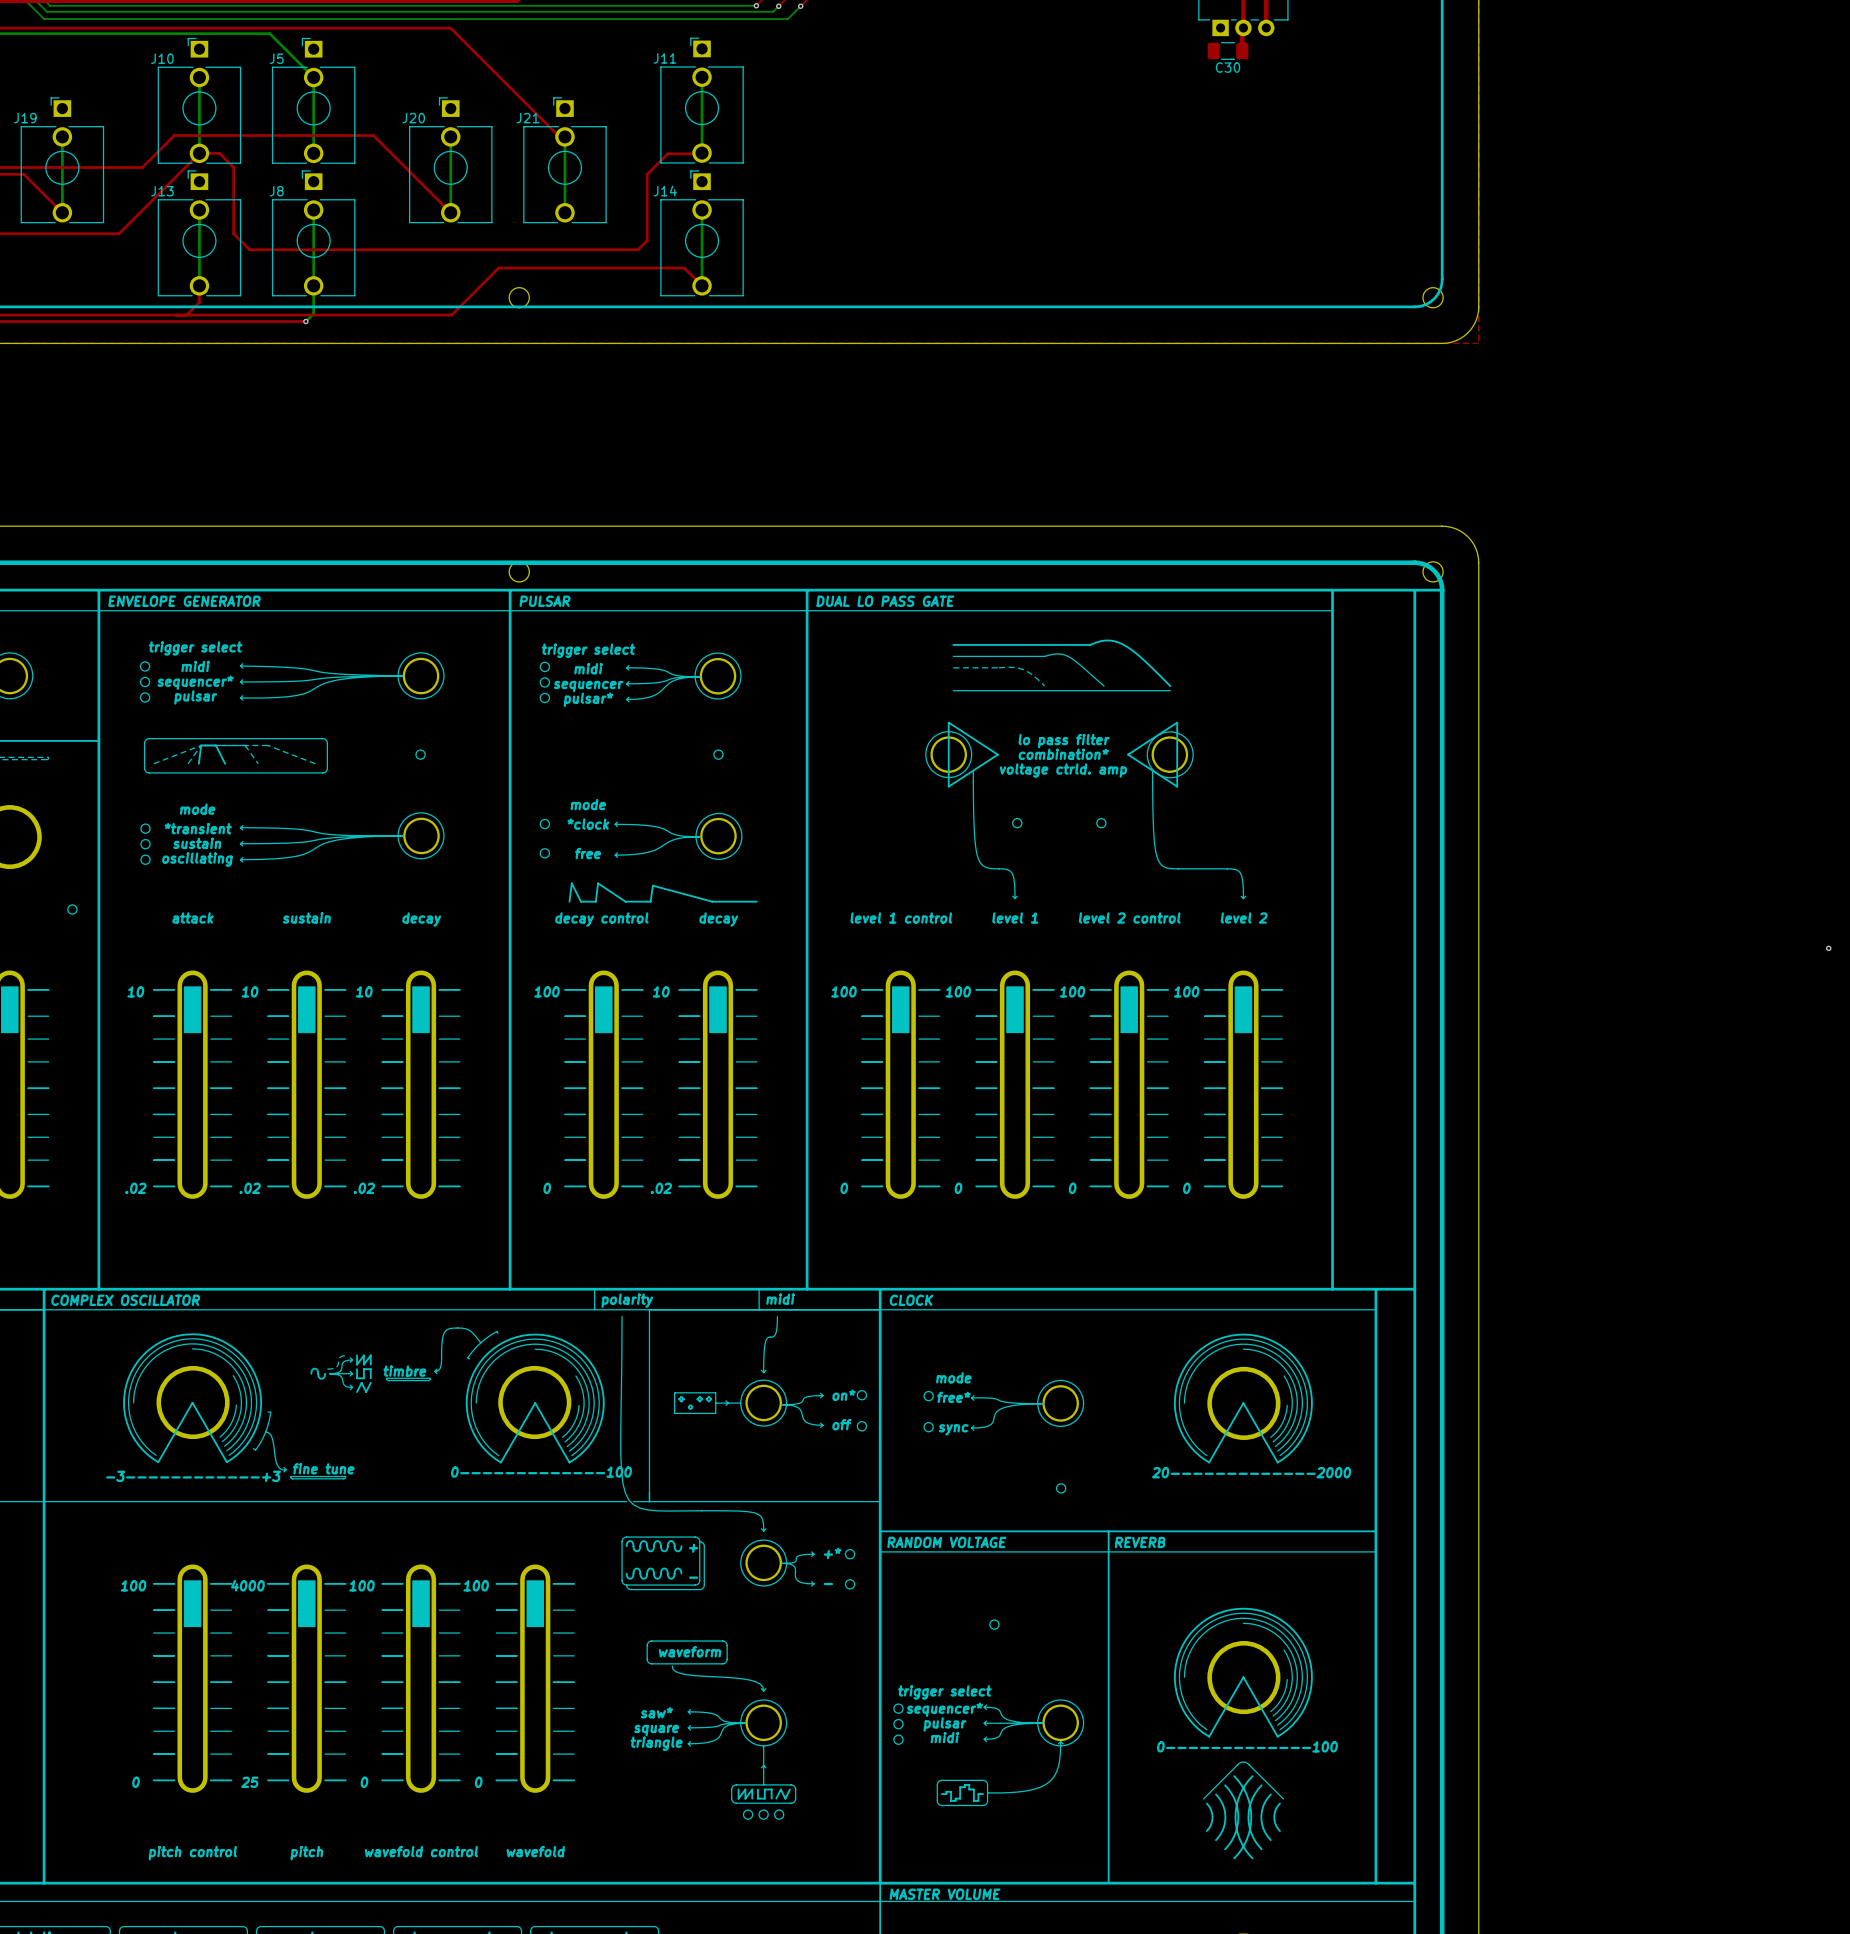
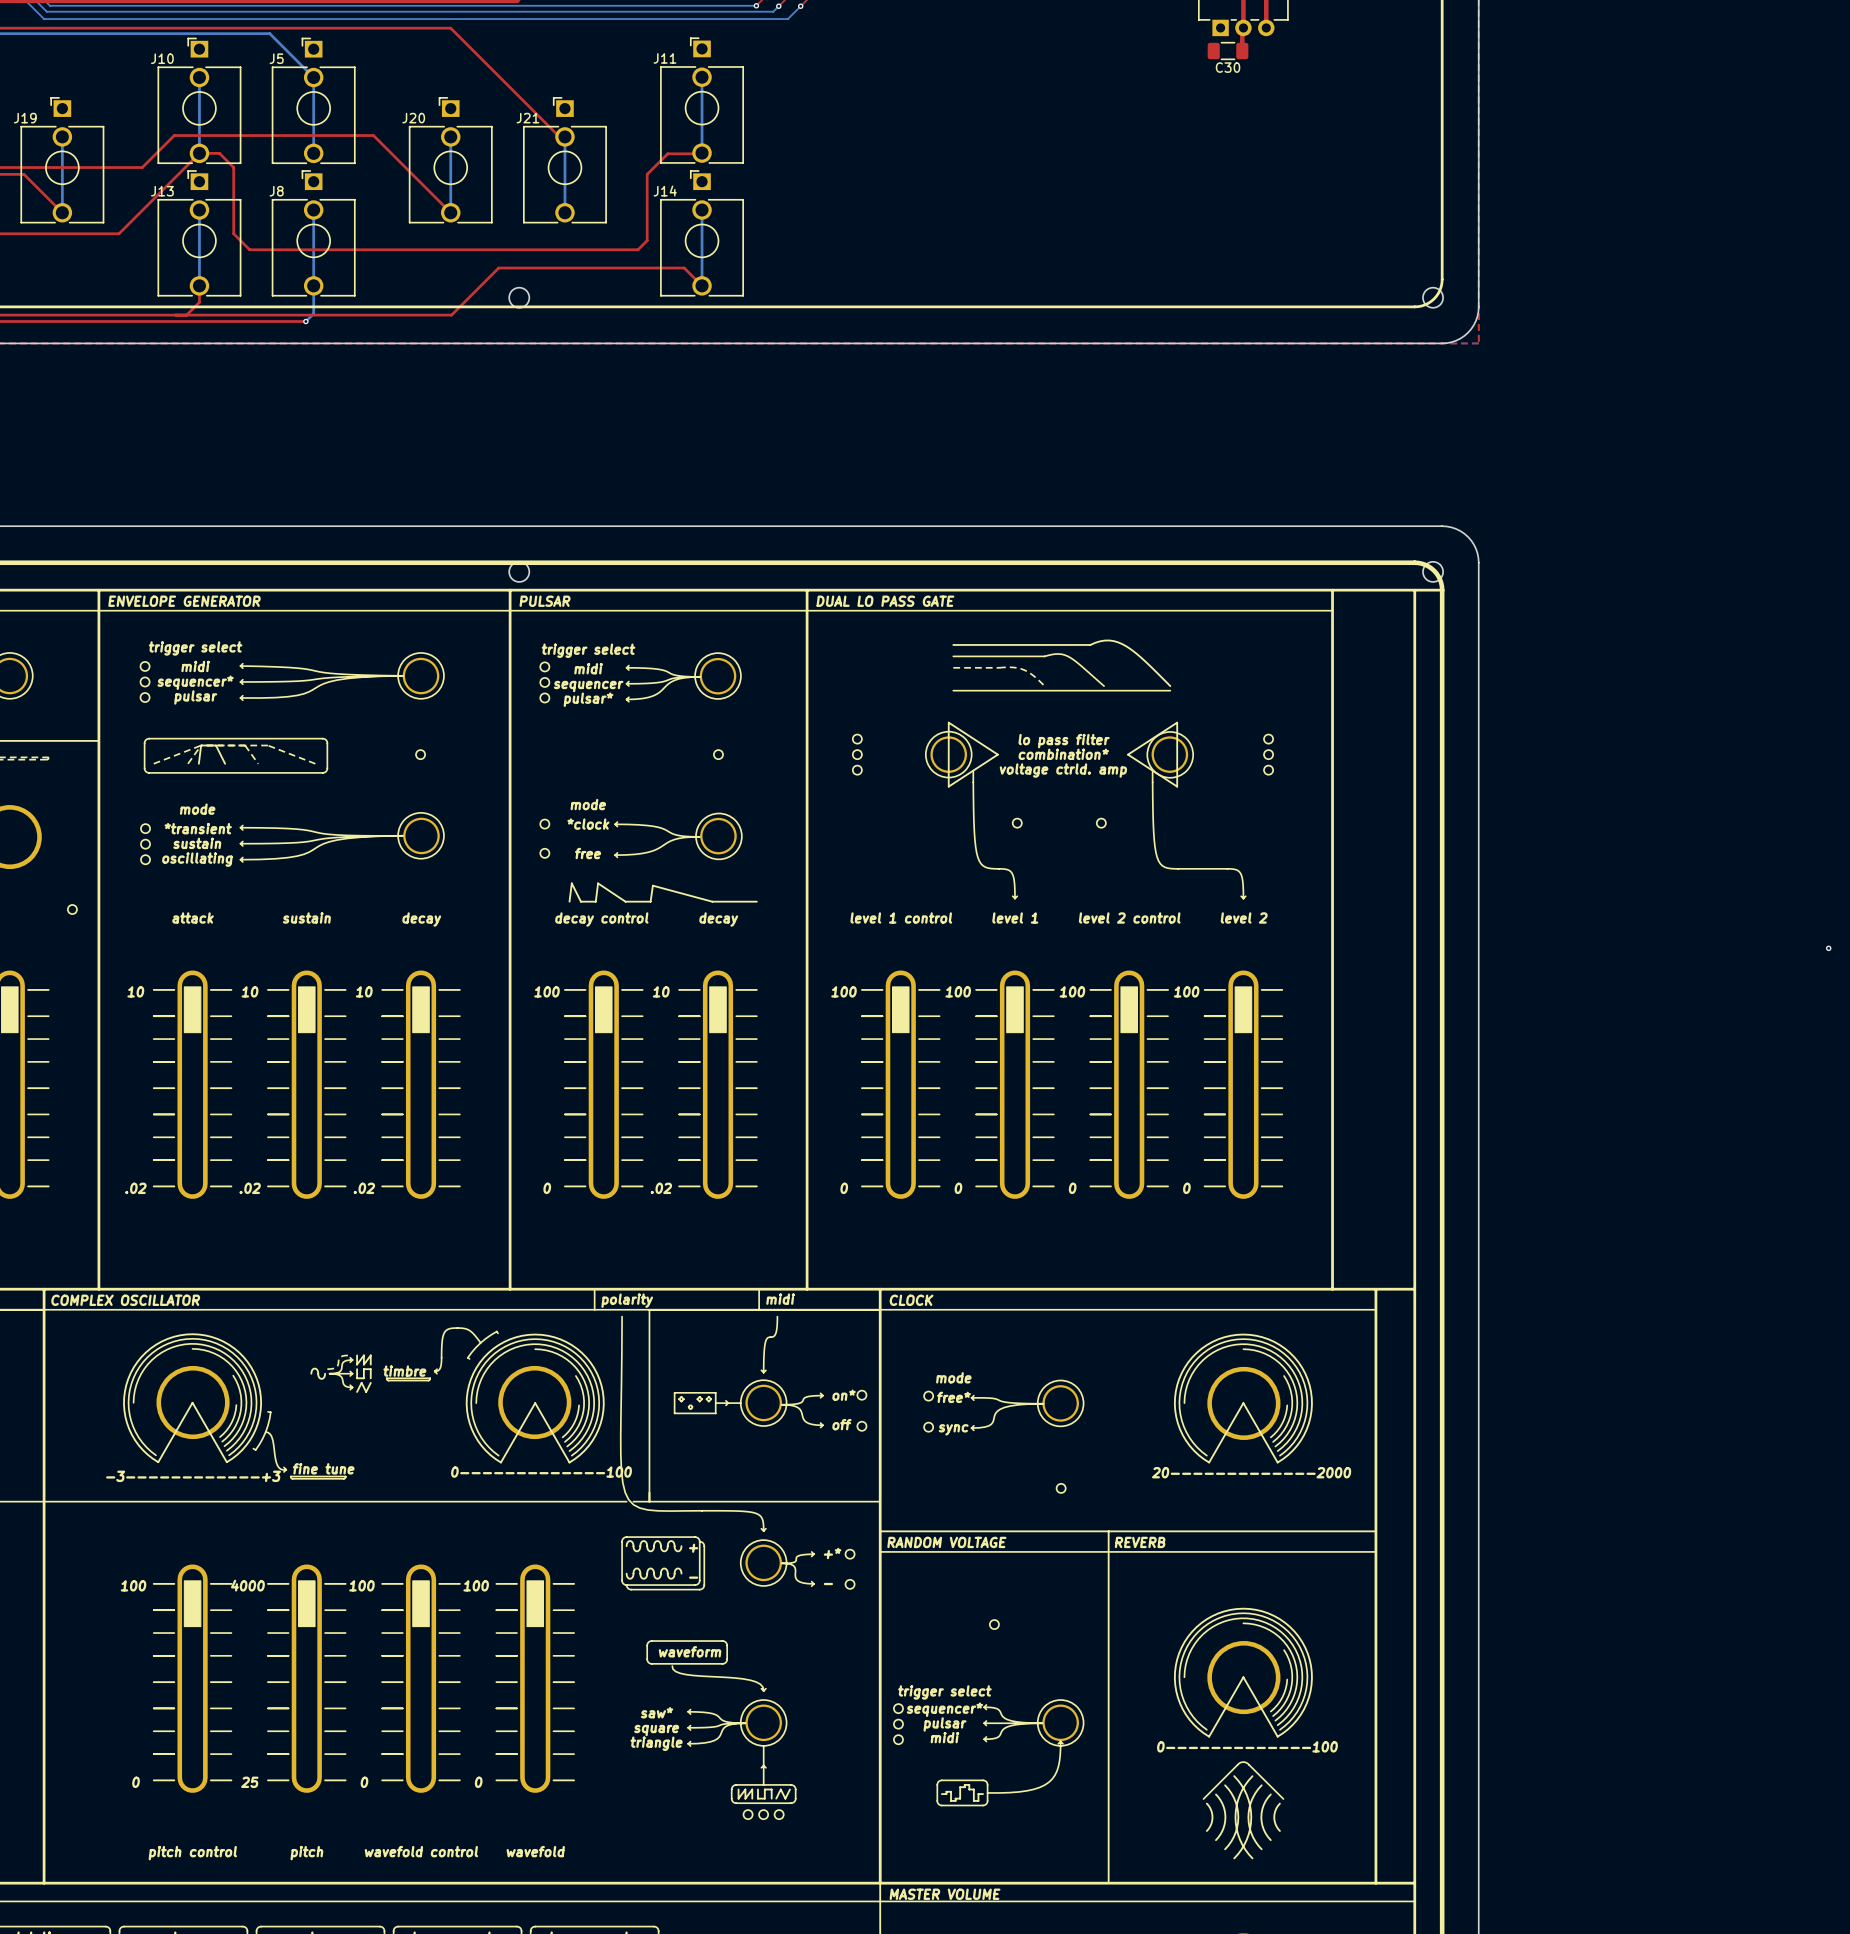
drawing: none -> [852, 734, 863, 776]
drawing: none -> [1263, 734, 1274, 776]

